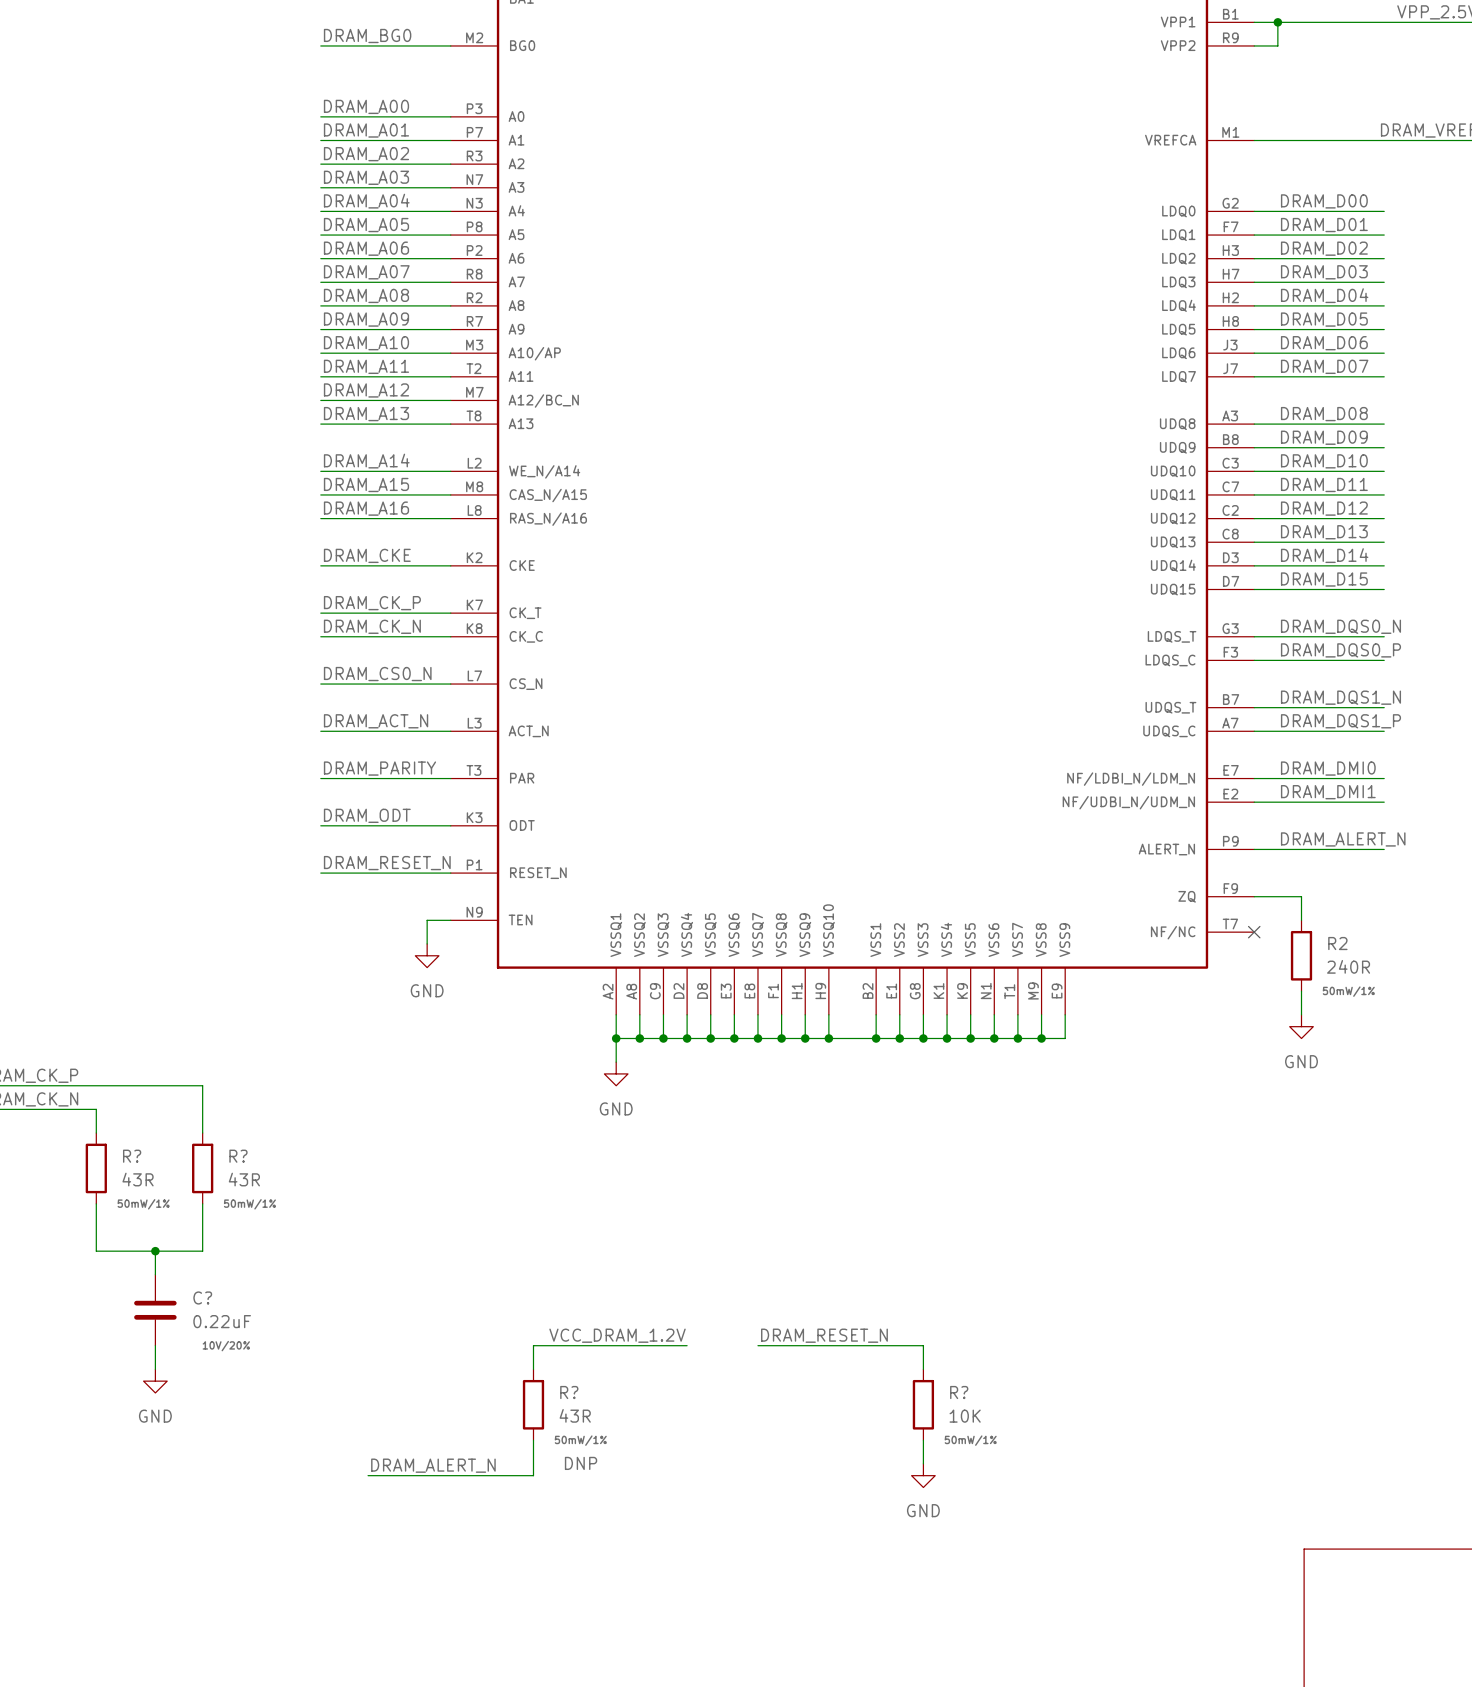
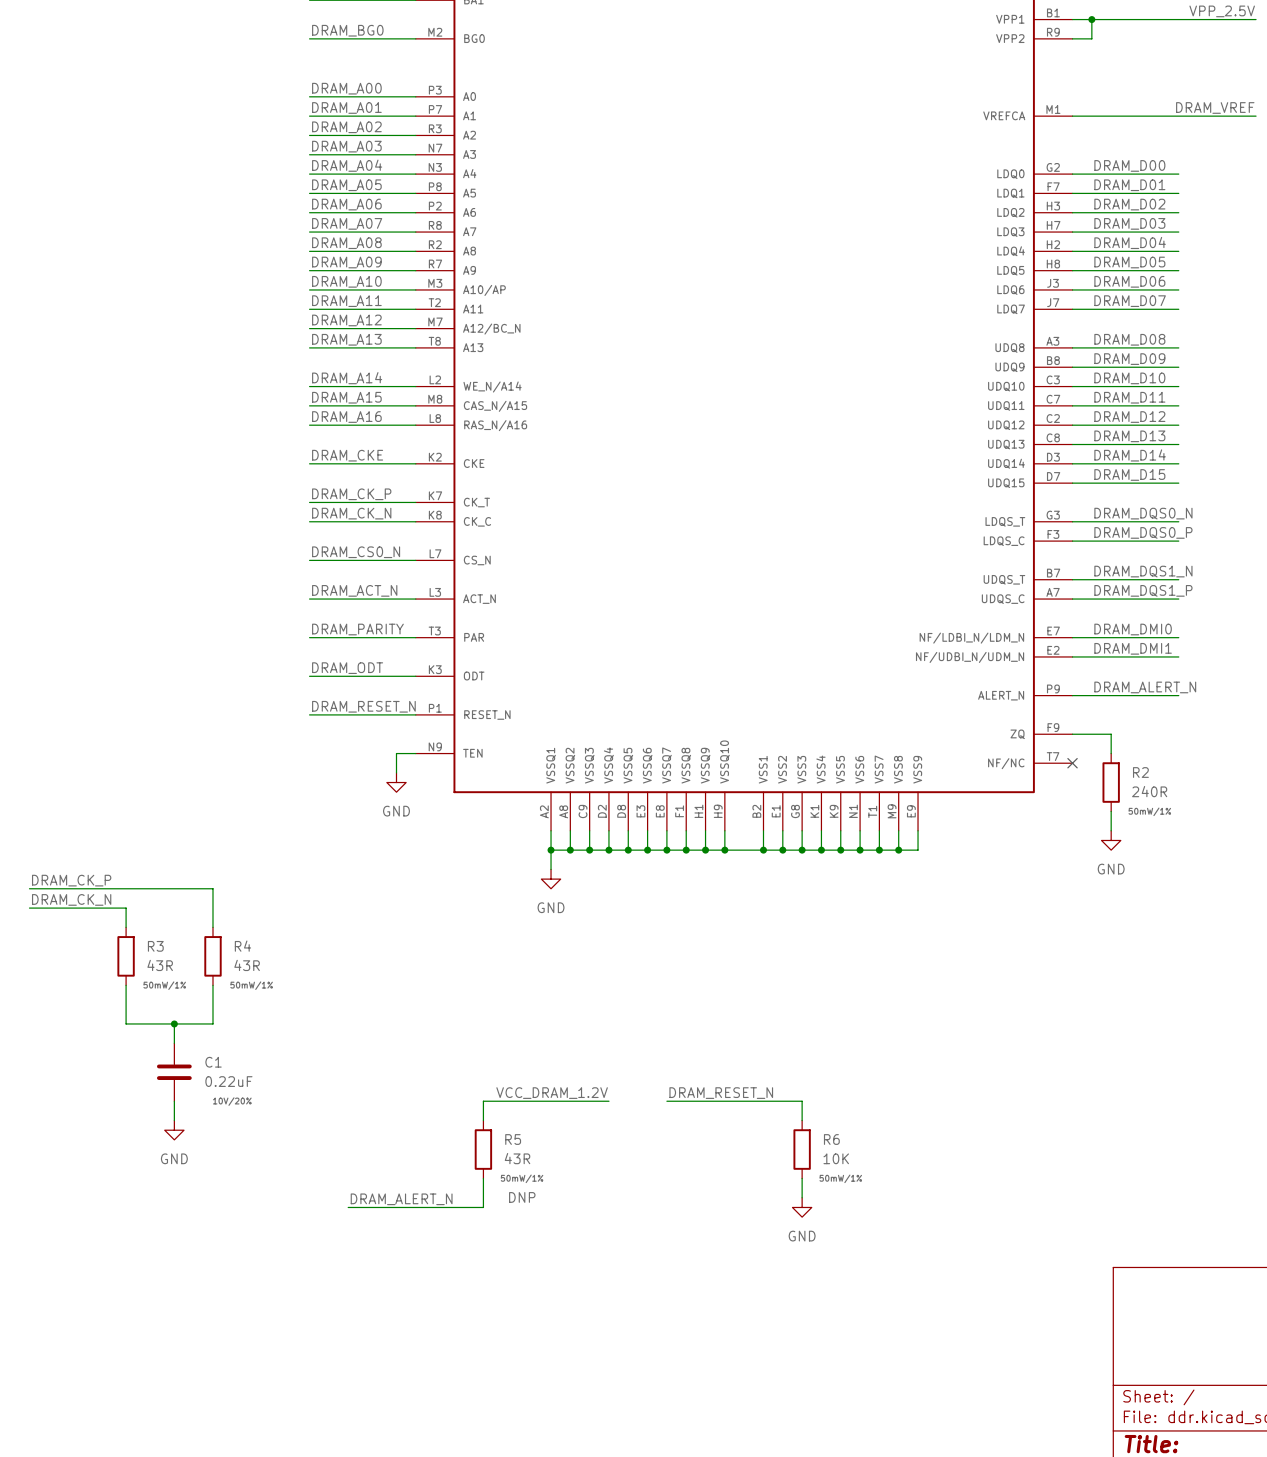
R? name: R? (132, 1156) -> R3 (155, 946)
R? name: R? (238, 1156) -> R4 (242, 946)
C? name: C? (202, 1297) -> C1 (213, 1062)
R? name: R? (569, 1392) -> R5 (513, 1139)
R? name: R? (959, 1392) -> R6 (831, 1139)

